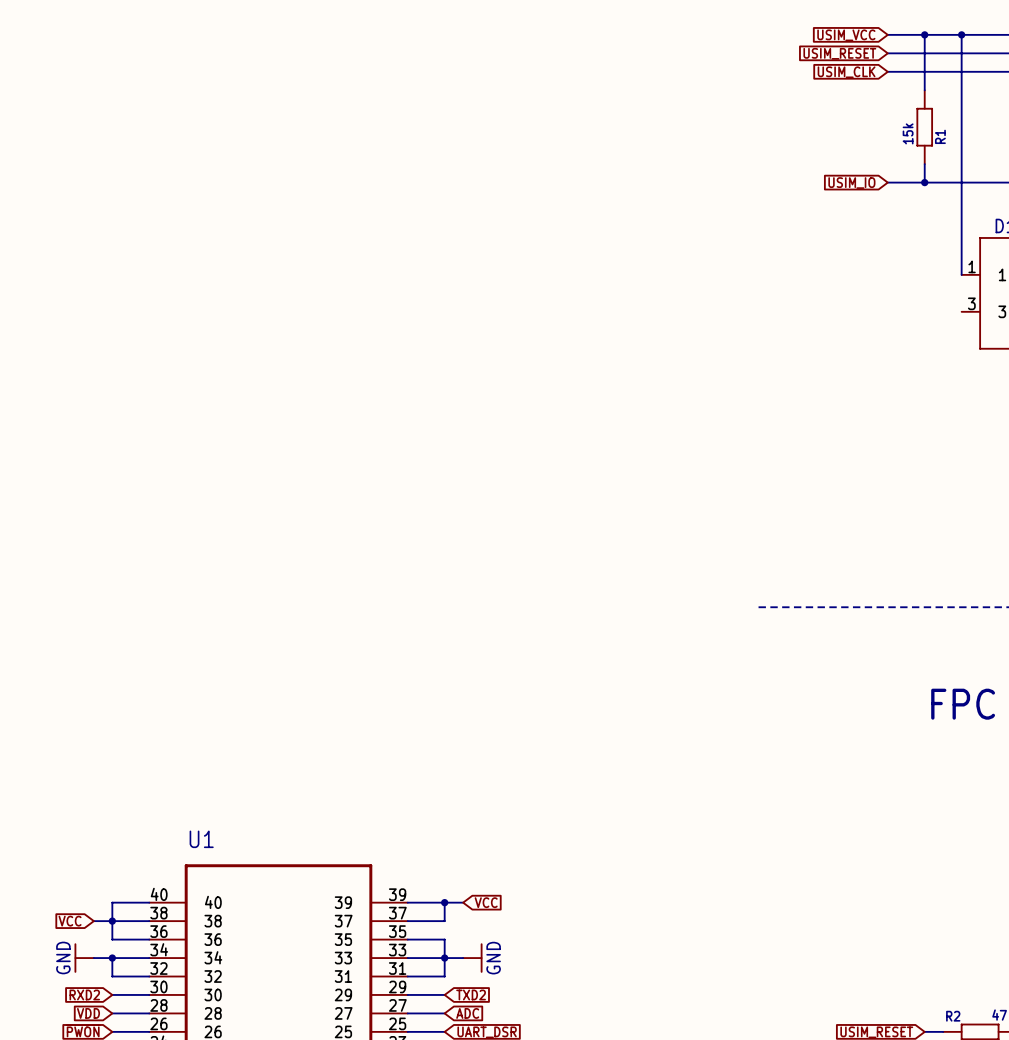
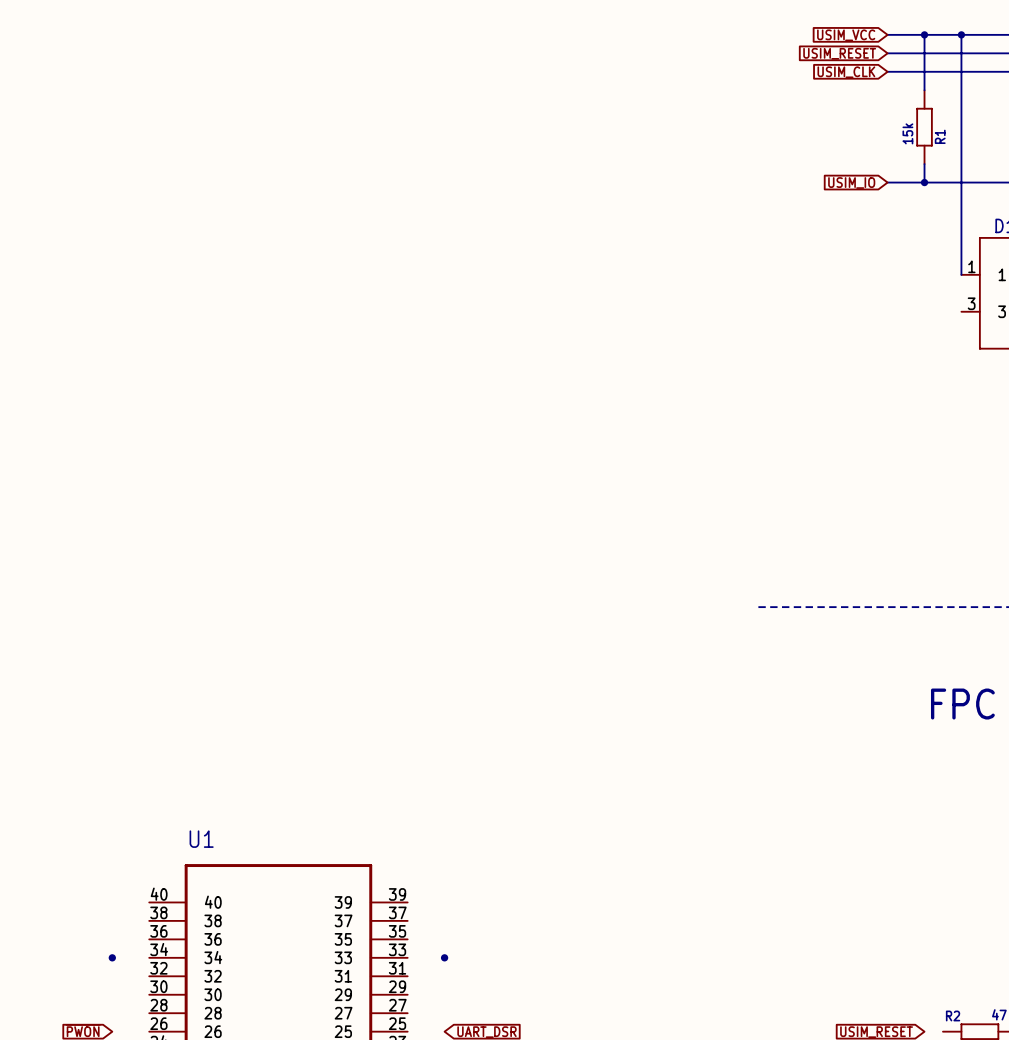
wire: (149, 902) (112, 902) (112, 939) (149, 939) -> none
wire: (407, 902) (463, 902) -> none
wire: (444, 902) (444, 921) (407, 921) -> none
junction: (444, 902) -> none
global label: VCC (486, 902) -> none
global label: VCC (70, 921) -> none
wire: (93, 921) (149, 921) -> none
junction: (112, 921) -> none
wire: (407, 939) (444, 939) (444, 976) (407, 976) -> none
power symbol: GND (84, 958) -> none
wire: (93, 958) (149, 958) -> none
wire: (112, 958) (112, 976) (149, 976) -> none
wire: (407, 958) (463, 958) -> none
power symbol: GND (472, 958) -> none
global label: RXD2 (84, 994) -> none
wire: (112, 994) (149, 994) -> none
wire: (407, 994) (444, 994) -> none
global label: TXD2 (471, 994) -> none
global label: VDD (88, 1013) -> none
wire: (112, 1013) (149, 1013) -> none
wire: (407, 1013) (444, 1013) -> none
global label: ADC (467, 1013) -> none
wire: (112, 1031) (149, 1031) -> none
wire: (407, 1031) (444, 1031) -> none
wire: (924, 1031) (943, 1031) -> none

